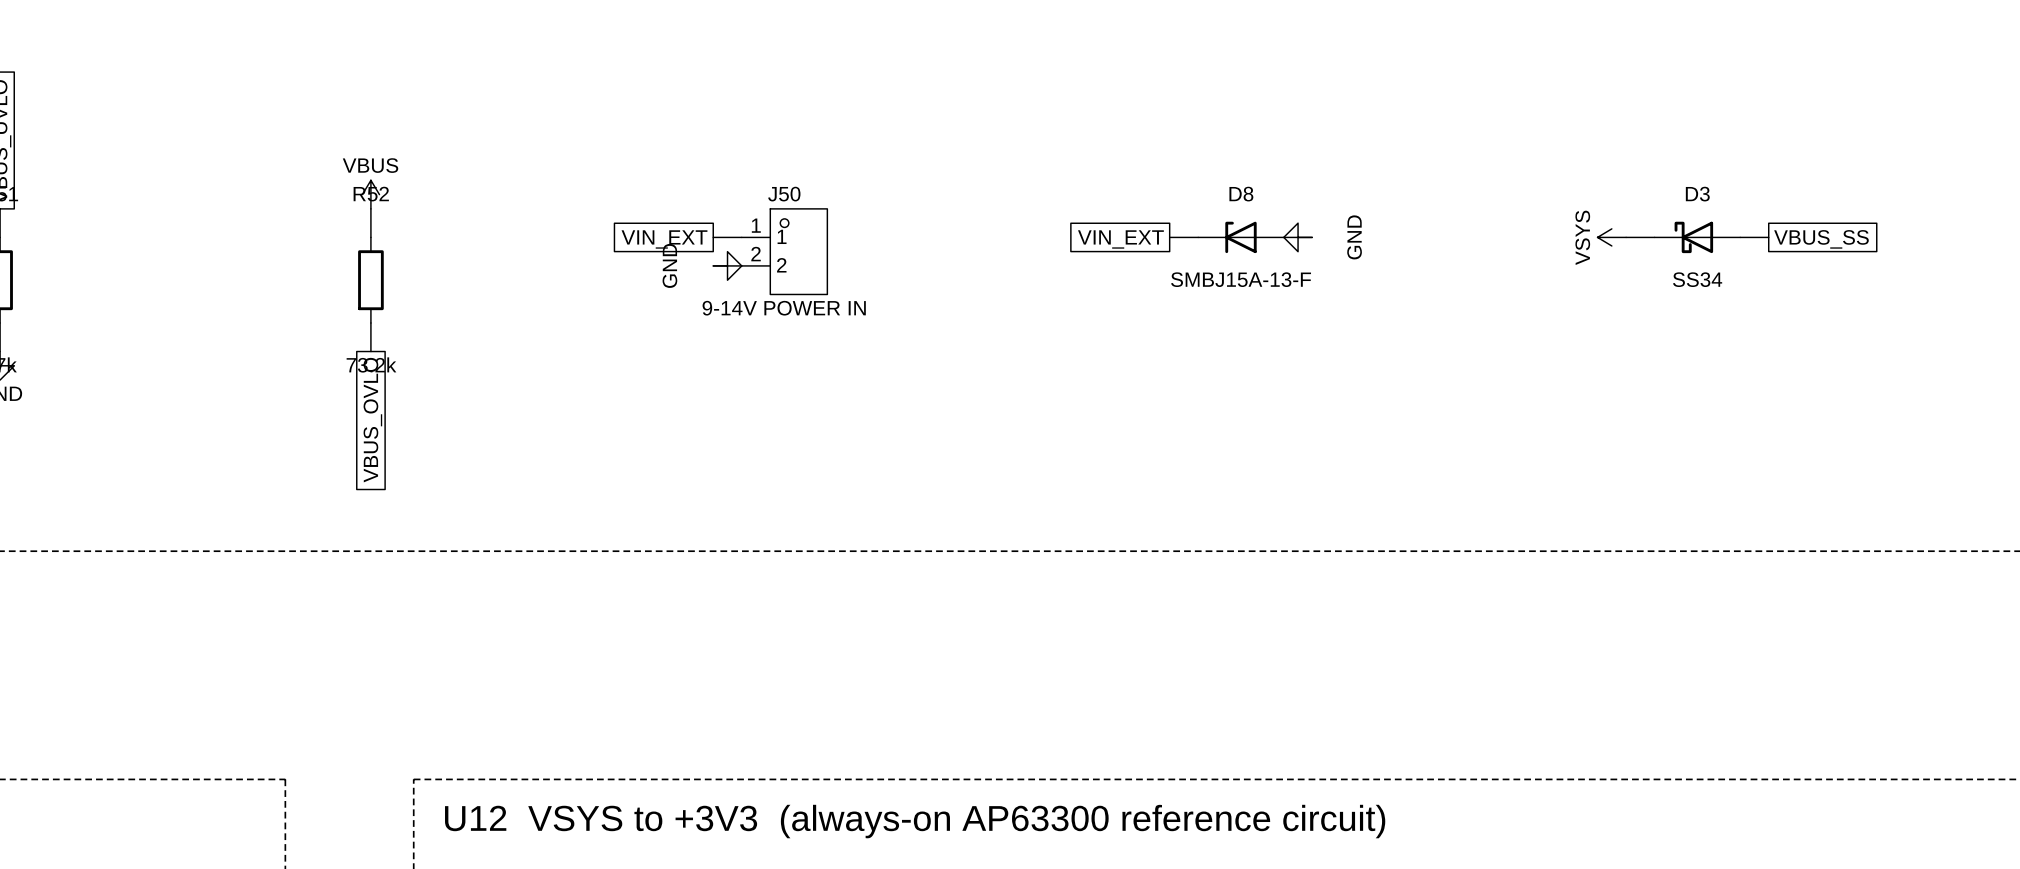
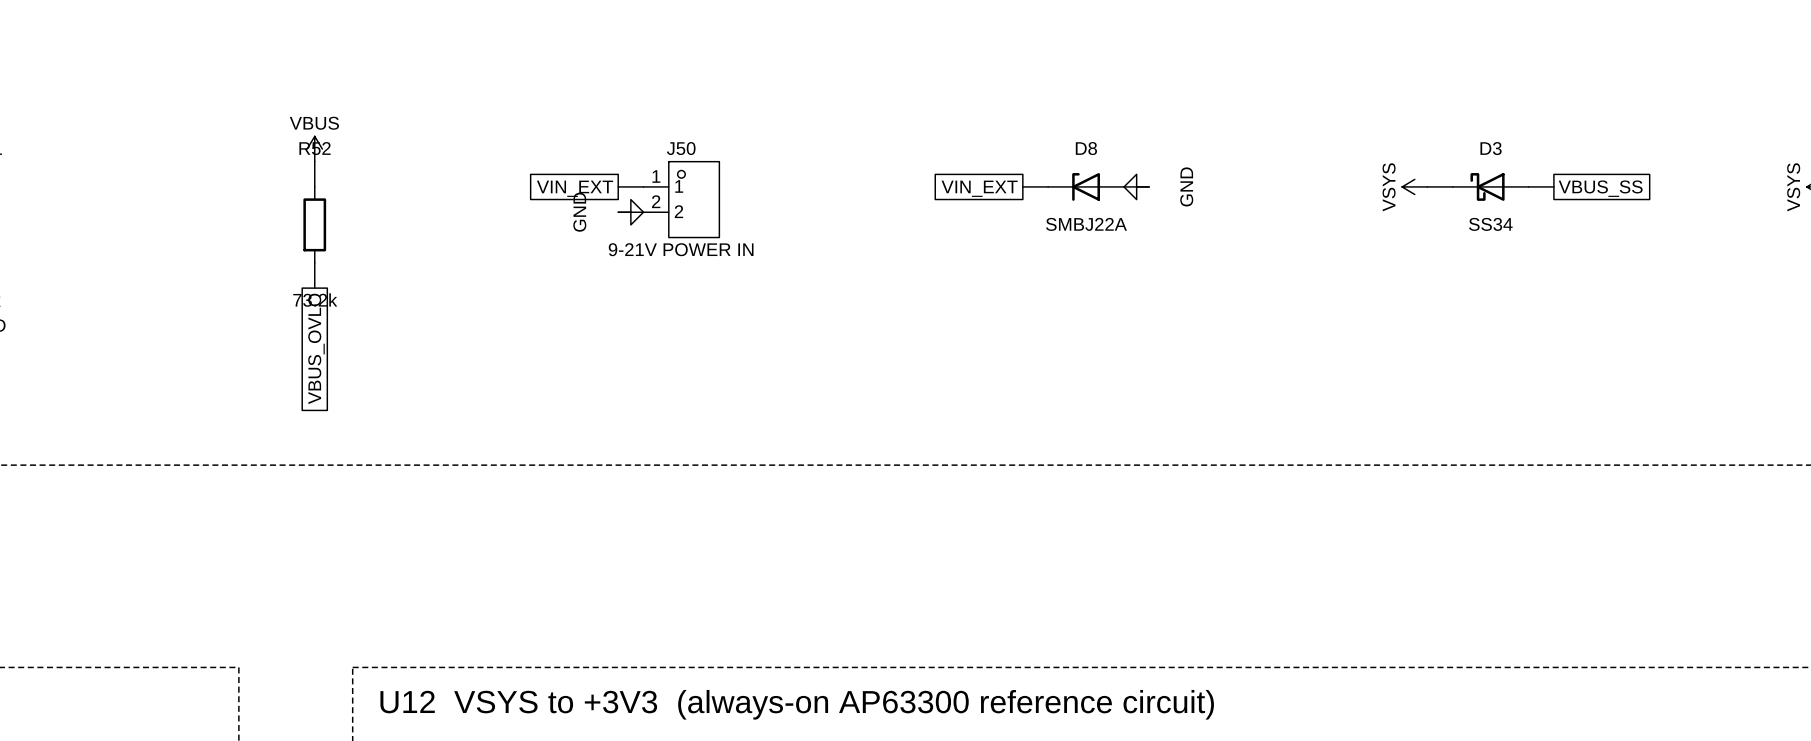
D8 value: SMBJ15A-13-F (1241, 279) -> SMBJ22A (1086, 224)
J50 value: 9-14V POWER IN (784, 308) -> 9-21V POWER IN (681, 249)

